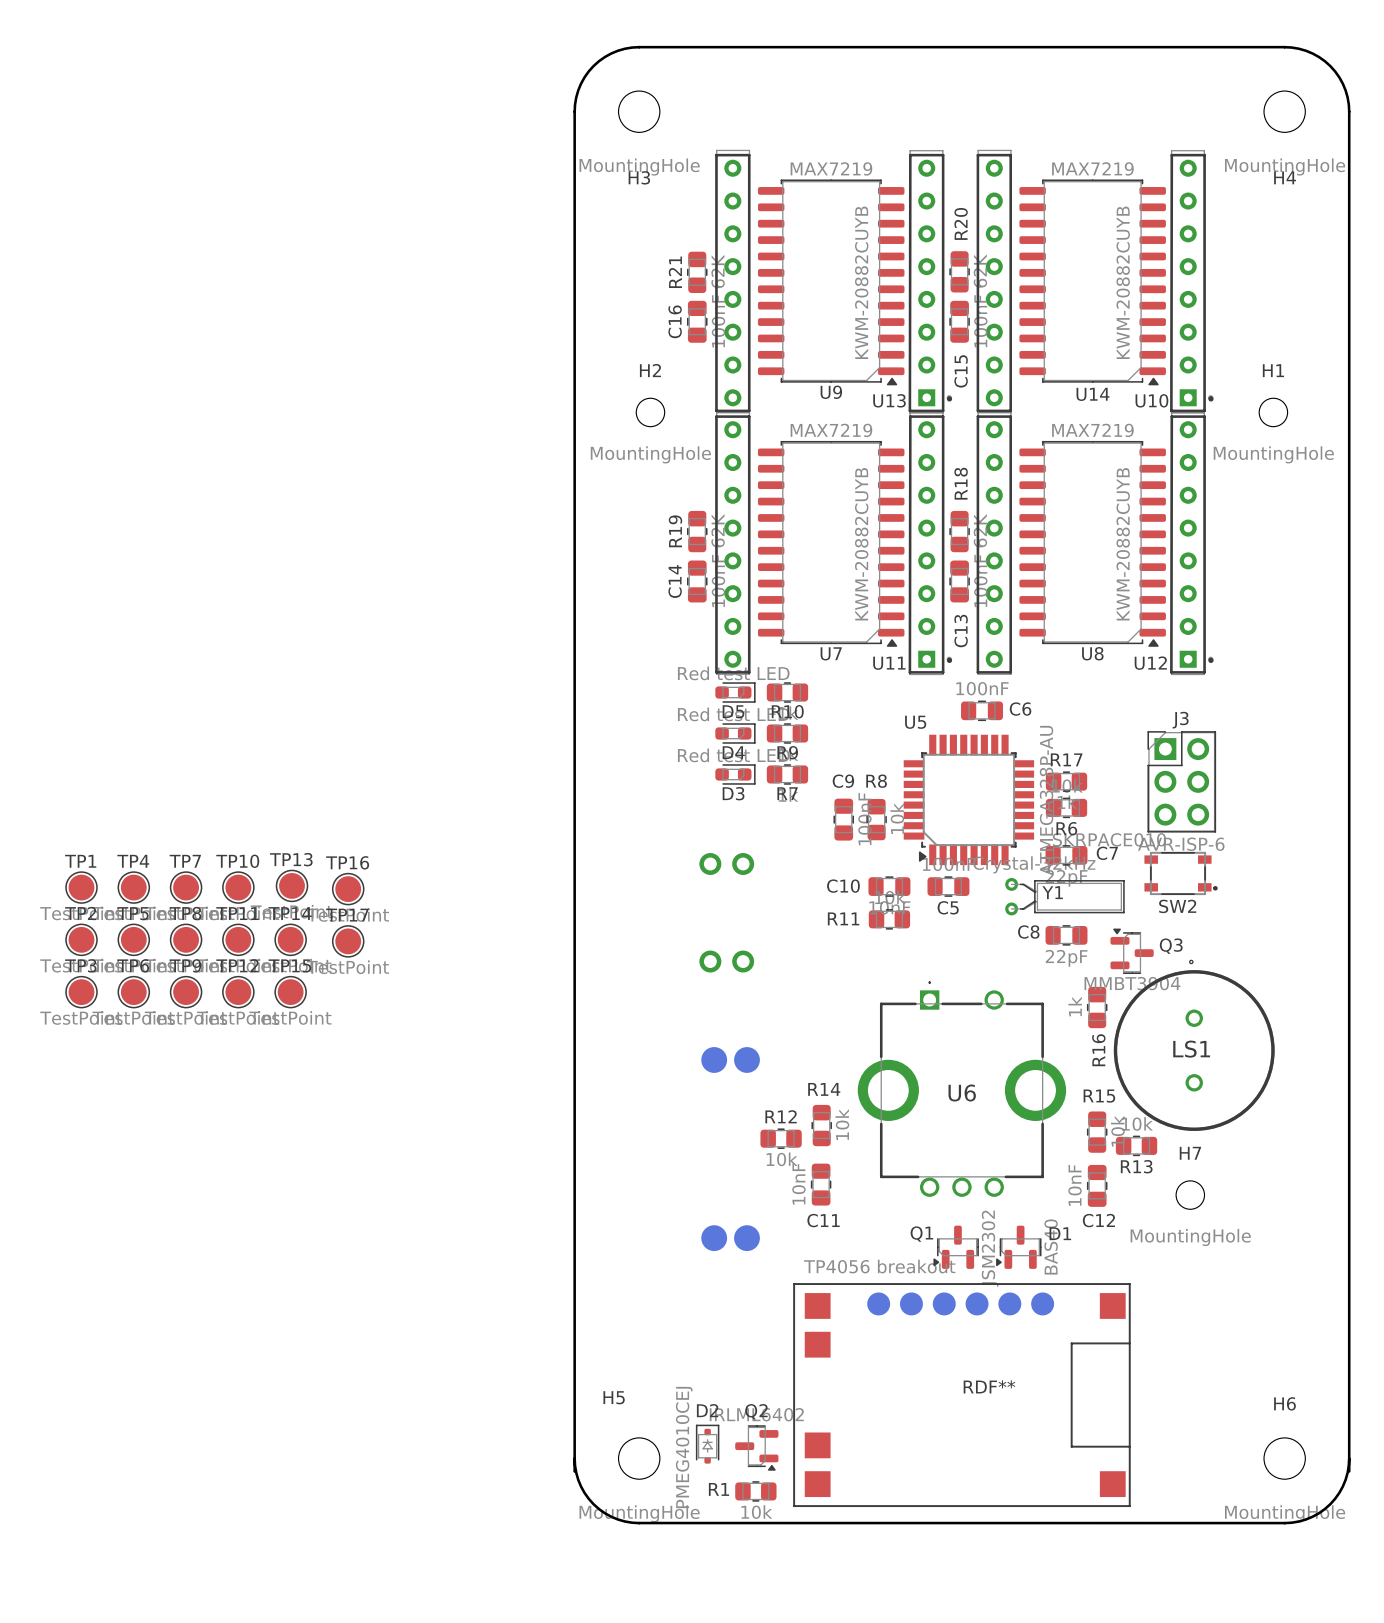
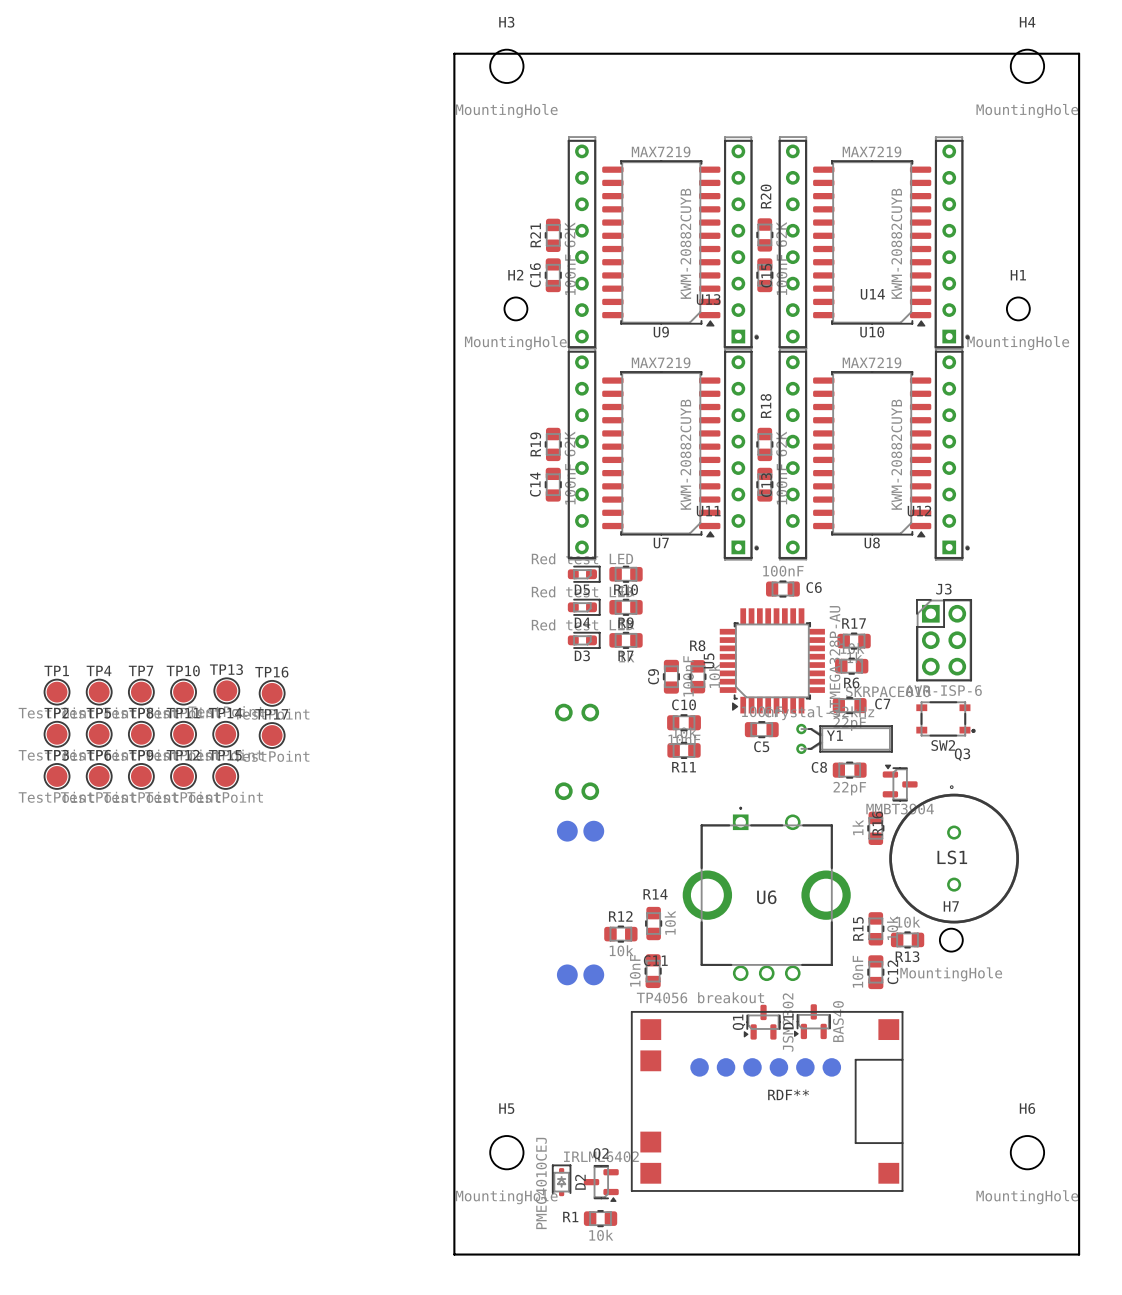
board edge: none -> (454, 53) (1079, 53) (1079, 1254) (454, 1254) (454, 53)
H3 name position: H3 (639, 177) -> H3 (506, 22)
H4 name position: H4 (1285, 177) -> H4 (1027, 22)
R20 position: (959, 271) -> (764, 234)
R21 position: (697, 272) -> (553, 235)
U13 position: (833, 281) -> (663, 242)
U14 position: (1095, 281) -> (874, 242)
U9 position: (831, 282) -> (661, 243)
U10 position: (1092, 282) -> (872, 243)
C16 position: (697, 321) -> (553, 275)
C15 position: (959, 321) -> (764, 275)
U10 name position: U10 (1151, 400) -> U10 (872, 332)
R19 position: (697, 531) -> (553, 444)
R18 position: (959, 531) -> (764, 444)
U7 position: (831, 543) -> (661, 454)
U11 position: (833, 543) -> (663, 453)
U8 position: (1092, 543) -> (872, 454)
U12 position: (1095, 543) -> (874, 453)
C14 position: (697, 581) -> (553, 484)
C13 position: (959, 581) -> (764, 484)
D5 position: (735, 692) -> (584, 574)
R10 position: (787, 692) -> (626, 574)
C6 position: (982, 710) -> (782, 589)
U5 name rotation: 0° (915, 722) -> 90° counterclockwise (709, 660)
U5 name position: U5 (915, 722) -> U5 (709, 660)
D4 position: (735, 733) -> (584, 607)
R9 position: (787, 733) -> (626, 607)
D3 position: (735, 774) -> (584, 640)
R7 position: (787, 774) -> (626, 640)
C9 name rotation: 0° (843, 781) -> 90° counterclockwise (653, 676)
C9 name position: C9 (843, 781) -> C9 (653, 676)
R17 position: (1066, 781) -> (854, 641)
J3 position: (1181, 781) -> (944, 640)
U5 position: (968, 799) -> (772, 660)
R6 position: (1066, 807) -> (851, 666)
C9 position: (843, 819) -> (671, 676)
R8 position: (876, 819) -> (697, 676)
C7 position: (1066, 855) -> (849, 705)
part: (726, 863) -> none
SW2 position: (1181, 873) -> (945, 718)
C10 name position: C10 (843, 886) -> C10 (684, 704)
C10 position: (889, 886) -> (684, 722)
C5 position: (948, 886) -> (761, 729)
Y1 position: (1064, 896) -> (844, 738)
part: none -> (577, 712)
R11 name position: R11 (843, 918) -> R11 (684, 767)
R11 position: (889, 919) -> (684, 750)
C8 position: (1066, 935) -> (849, 770)
Q3 name position: Q3 (1171, 946) -> Q3 (962, 754)
Q3 position: (1132, 951) -> (900, 782)
part: (726, 961) -> none
R16 position: (1097, 1007) -> (875, 828)
part: none -> (577, 791)
LS1 position: (1194, 1045) -> (954, 854)
U6 position: (961, 1089) -> (766, 894)
R15 name rotation: 0° (1099, 1096) -> 90° counterclockwise (858, 928)
R14 position: (821, 1125) -> (653, 923)
R15 position: (1097, 1132) -> (875, 928)
R12 position: (781, 1138) -> (620, 934)
R13 position: (1136, 1145) -> (907, 939)
C11 position: (821, 1184) -> (653, 971)
C12 position: (1097, 1185) -> (875, 972)
C12 name rotation: 0° (1098, 1220) -> 90° counterclockwise (892, 972)
D1 name rotation: 0° (1060, 1233) -> 90° counterclockwise (788, 1021)
D1 name position: D1 (1060, 1233) -> D1 (788, 1021)
Q1 name rotation: 0° (921, 1234) -> 90° counterclockwise (739, 1022)
Q1 position: (956, 1247) -> (762, 1022)
D1 position: (1018, 1247) -> (812, 1021)
part position: (960, 1303) -> (765, 1067)
H5 name position: H5 (614, 1397) -> H5 (506, 1108)
D2 name rotation: 0° (707, 1410) -> 90° counterclockwise (580, 1182)
D2 name position: D2 (707, 1410) -> D2 (580, 1182)
D2 position: (707, 1444) -> (561, 1180)
Q2 position: (756, 1447) -> (601, 1183)
board edge: (574, 1458) (576, 1472) (581, 1486) (593, 1504) (611, 1516) (624, 1521) (639, 1523) (1291, 1522) (1312, 1516) (1324, 1509) (1335, 1498) (1345, 1479) (1349, 1458) -> none
board edge: (574, 1471) (574, 111) (576, 97) (581, 83) (593, 66) (604, 57) (617, 50) (639, 47) (1284, 47) (1299, 48) (1319, 57) (1330, 66) (1342, 83) (1347, 97) (1349, 111) (1349, 1471) -> none
R1 position: (755, 1491) -> (600, 1218)

